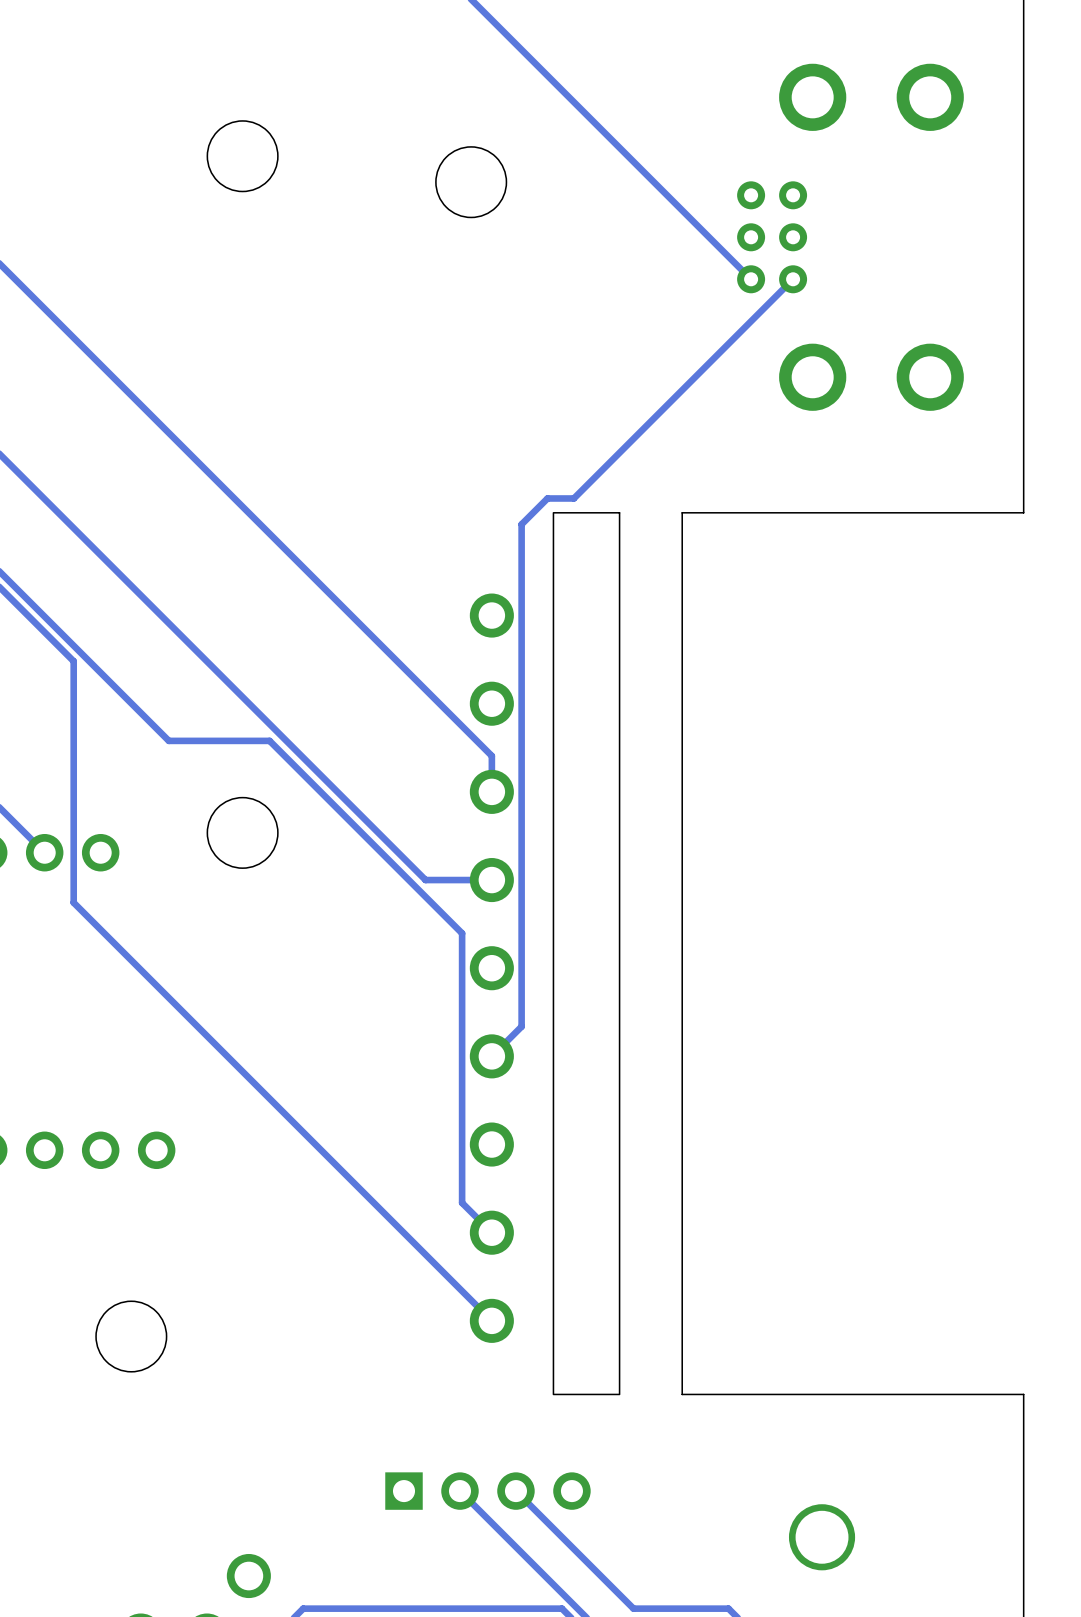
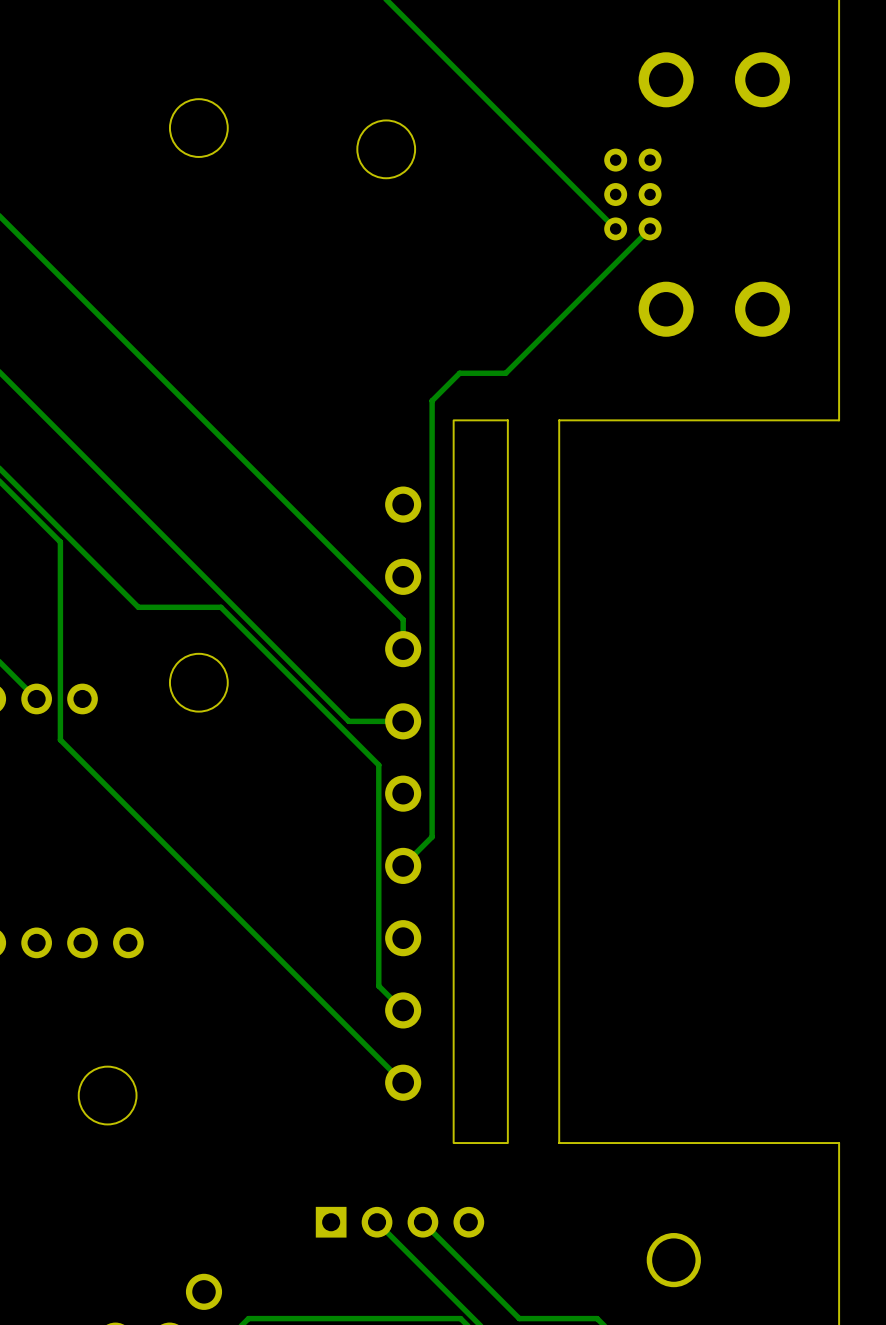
track: (617, 455) (573, 498) (547, 498) (521, 524) (521, 1026) -> (505, 373) (459, 373) (432, 400) (432, 836) (427, 841)

